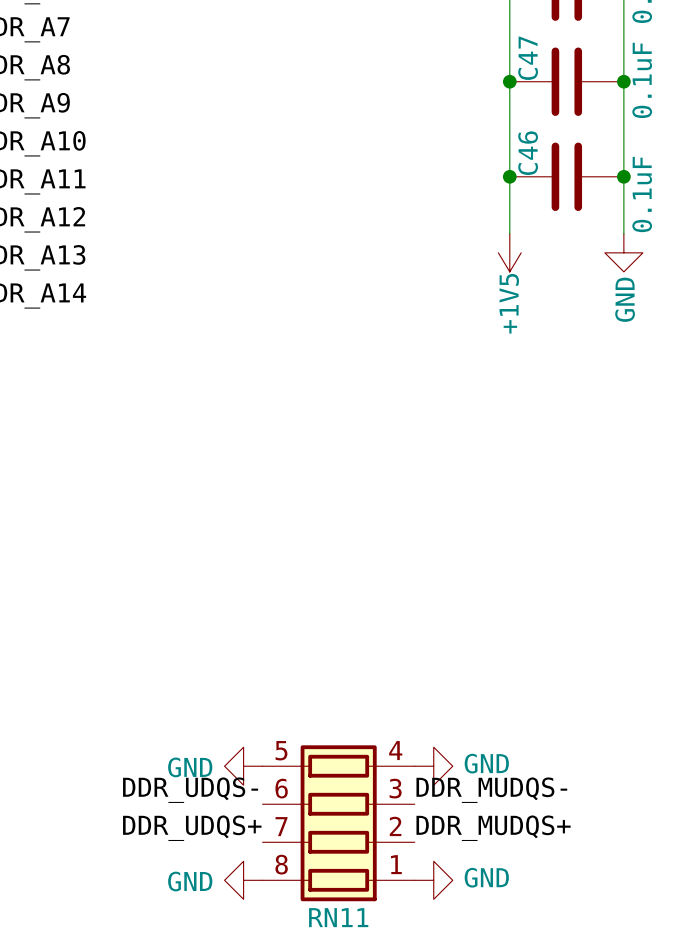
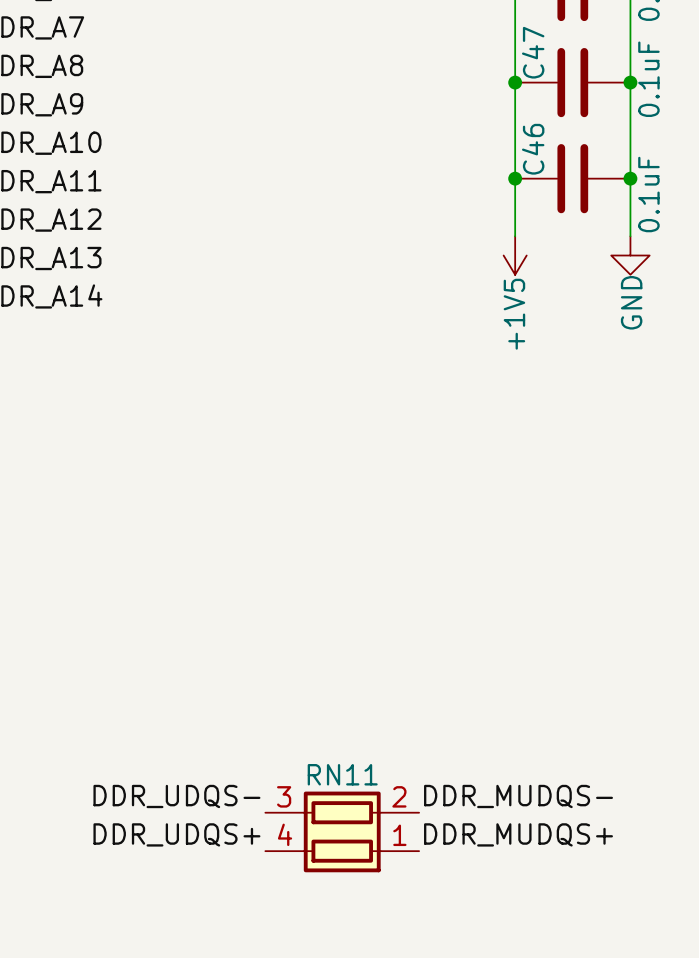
RN11 symbol: [262, 745, 415, 902] -> [265, 791, 420, 873]
power symbol: GND (243, 766) -> none
power symbol: GND (433, 766) -> none
power symbol: GND (243, 880) -> none
power symbol: GND (433, 880) -> none
RN11 name position: RN11 (338, 917) -> RN11 (342, 774)

